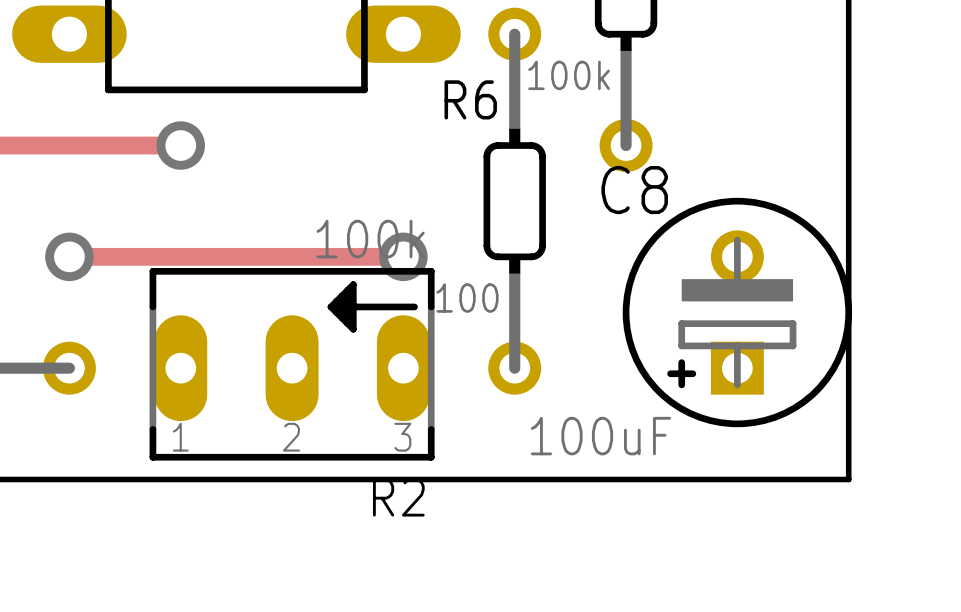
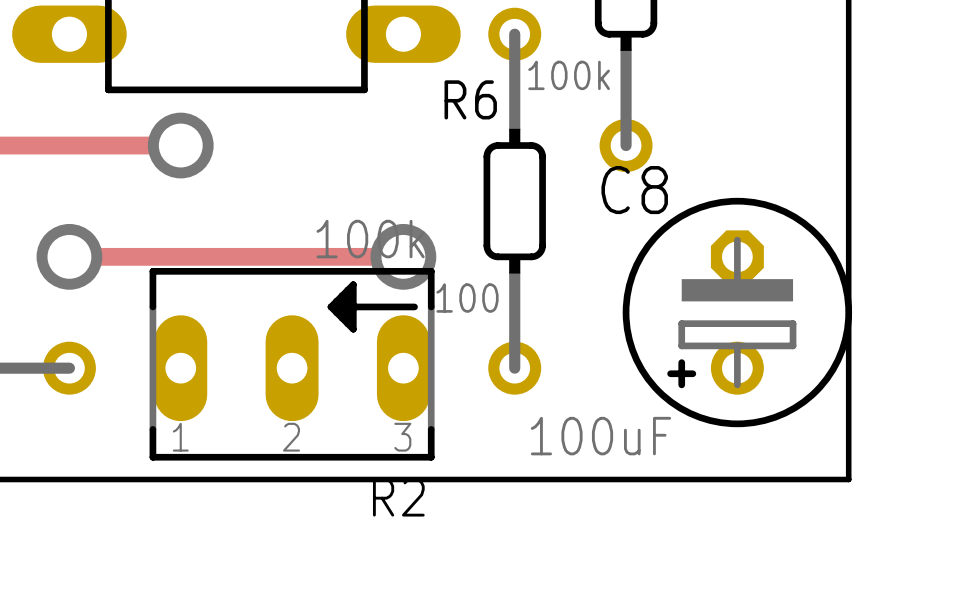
via size: [156, 121, 206, 170] -> [147, 112, 214, 179]
C8 footprint: [622, 197, 853, 428] -> [622, 197, 853, 428]
via size: [45, 232, 94, 282] -> [36, 223, 103, 290]
via size: [379, 232, 428, 282] -> [370, 223, 437, 290]

